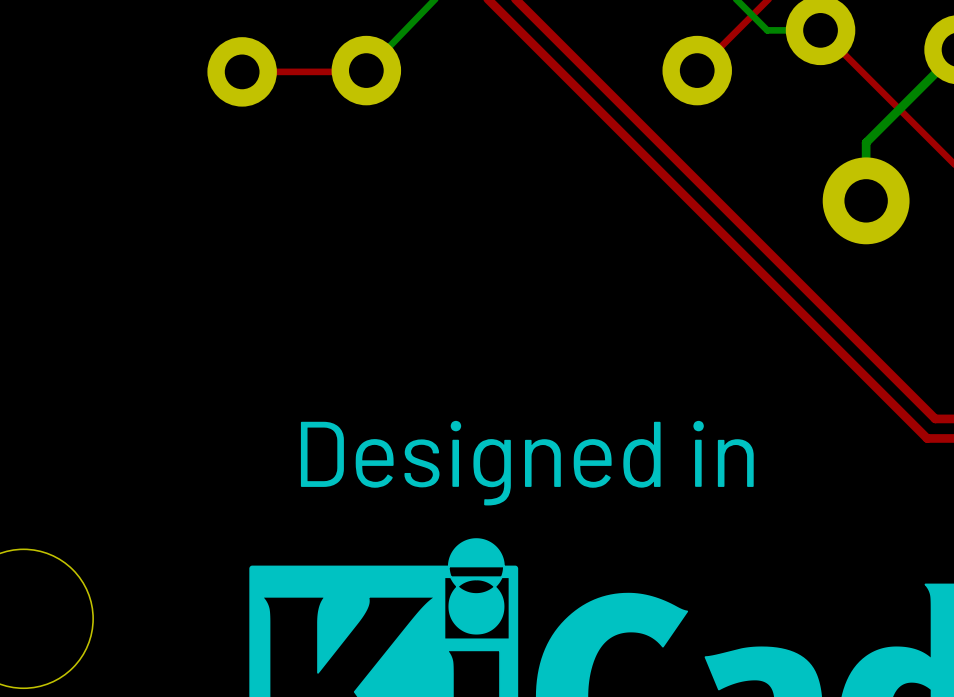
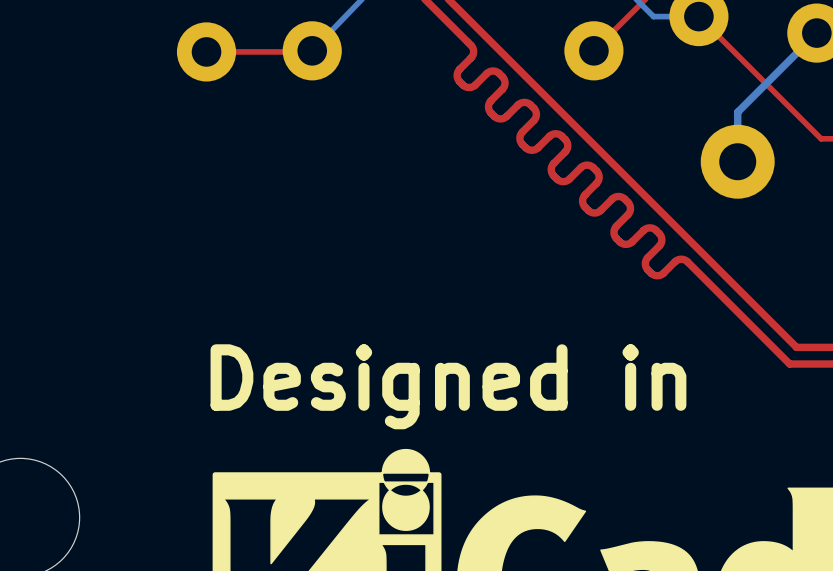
top track: (552, 64) (586, 97) -> (471, 45) (473, 54) (458, 71) (457, 77) (459, 81) (465, 86) (471, 87) (489, 71) (499, 73)
top track: (589, 101) (622, 134) -> (502, 76) (504, 81) (504, 86) (488, 104) (489, 110) (494, 116) (502, 118) (520, 103) (530, 104)
top track: (626, 137) (659, 171) -> (533, 108) (536, 112) (535, 118) (520, 136) (520, 142) (525, 147) (534, 149) (552, 134) (562, 136)
top track: (663, 174) (696, 207) -> (565, 139) (567, 143) (566, 149) (551, 166) (553, 175) (559, 180) (565, 181) (583, 165) (593, 167)
top track: (700, 211) (733, 244) -> (596, 170) (598, 175) (598, 180) (583, 198) (585, 207) (591, 212) (596, 212) (615, 197) (624, 199)
top track: (737, 248) (770, 281) -> (627, 202) (630, 211) (614, 228) (614, 234) (616, 238) (622, 243) (628, 244) (646, 228) (656, 230)
top track: (773, 285) (807, 318) -> (659, 233) (661, 237) (660, 243) (645, 261) (646, 267) (651, 273) (659, 275) (677, 259) (687, 261)

